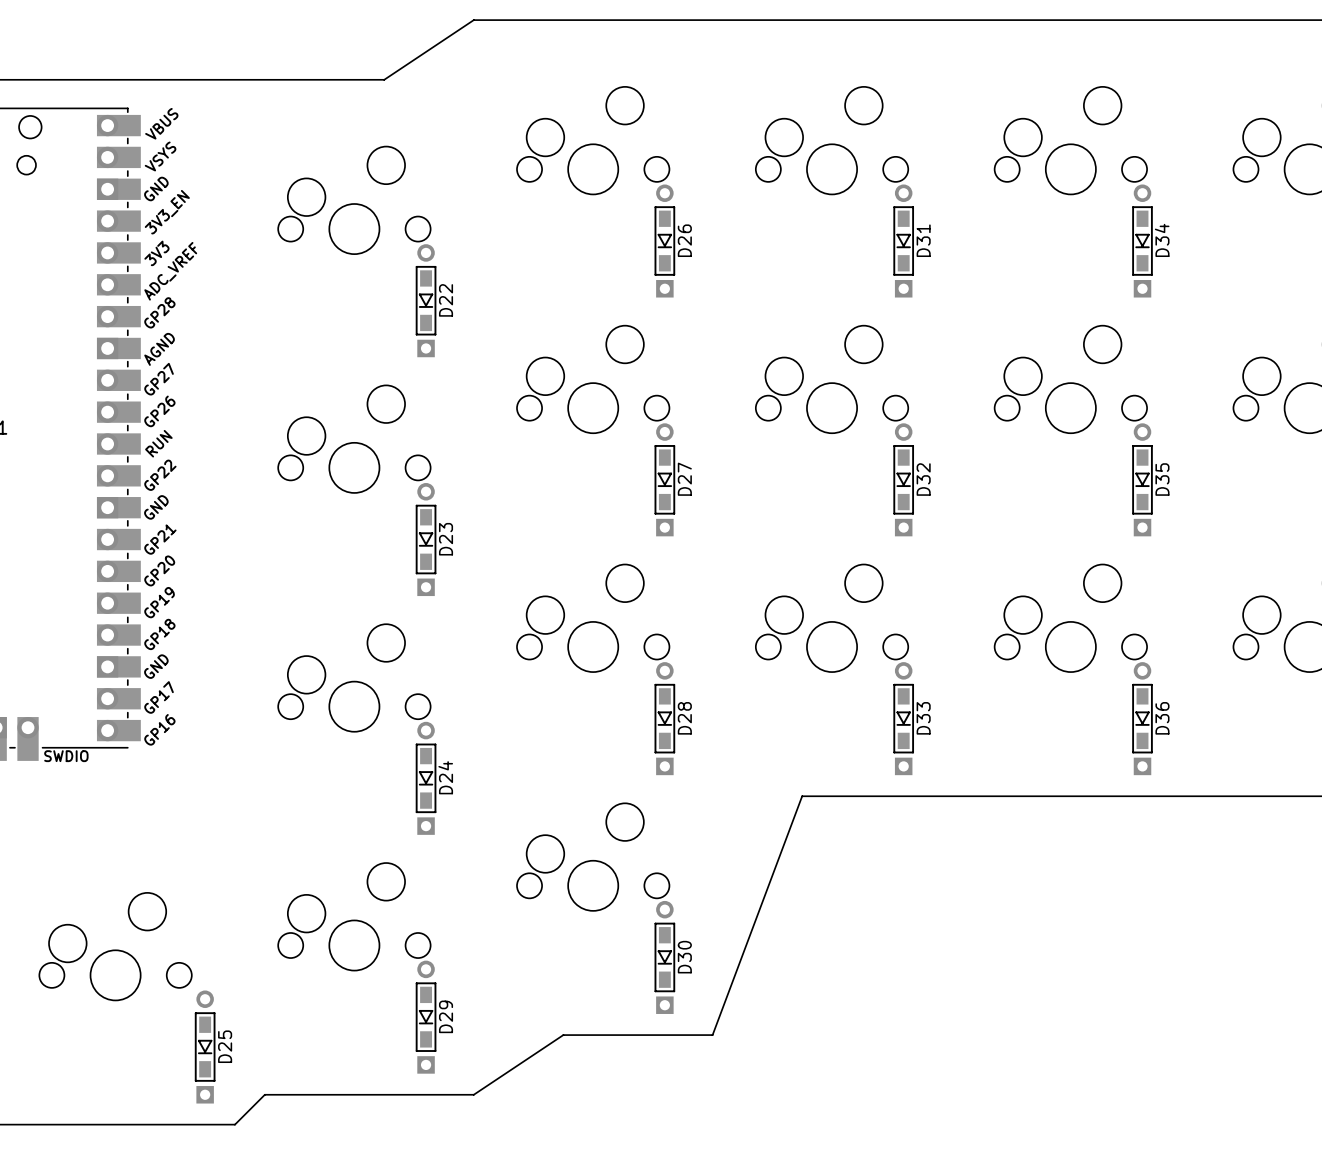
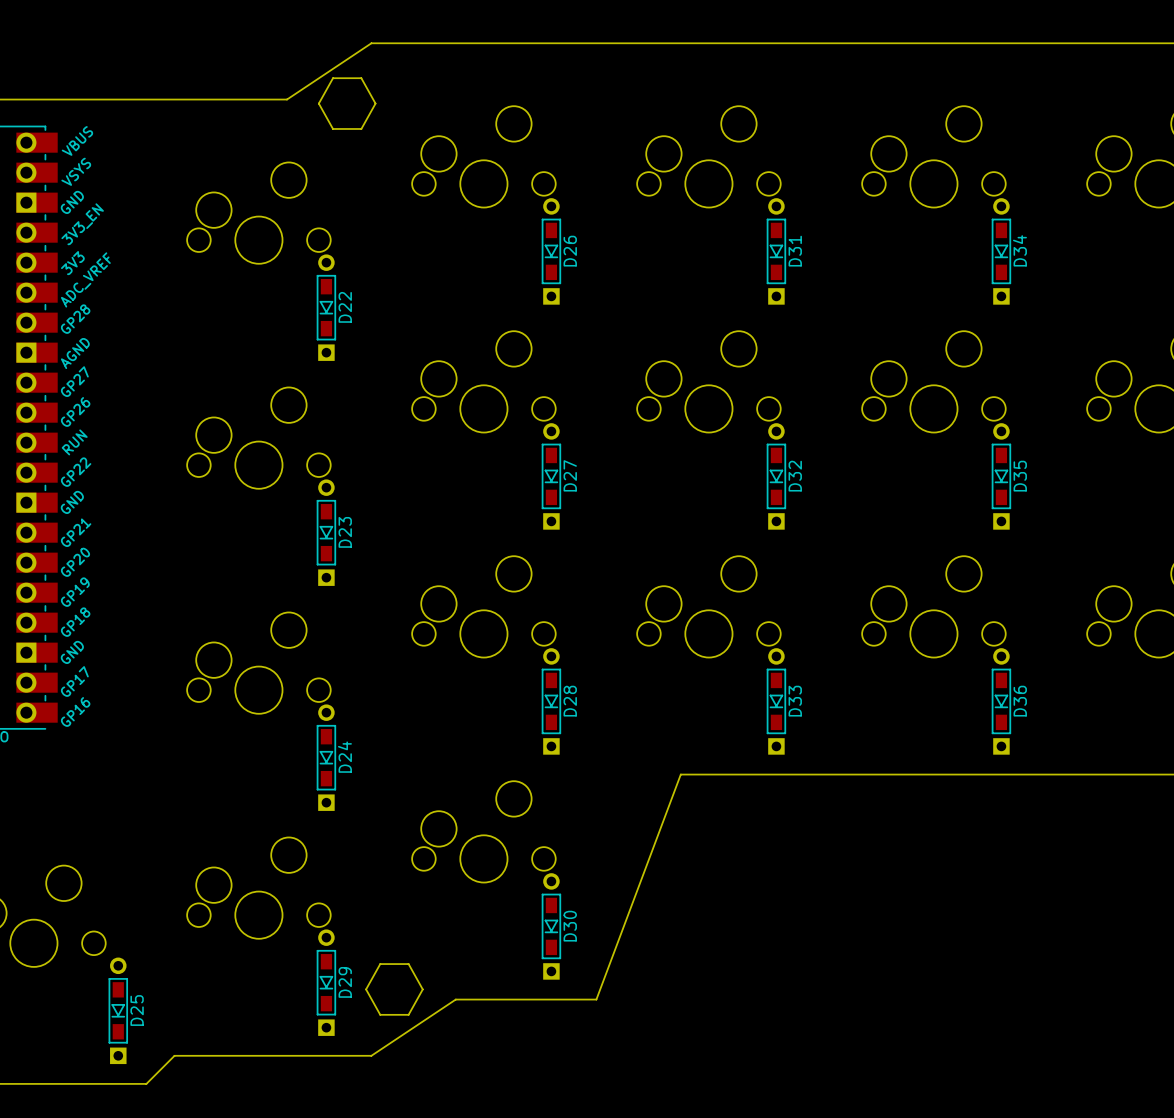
drawing: none -> [318, 77, 377, 130]
drawing: none -> [365, 963, 424, 1016]

